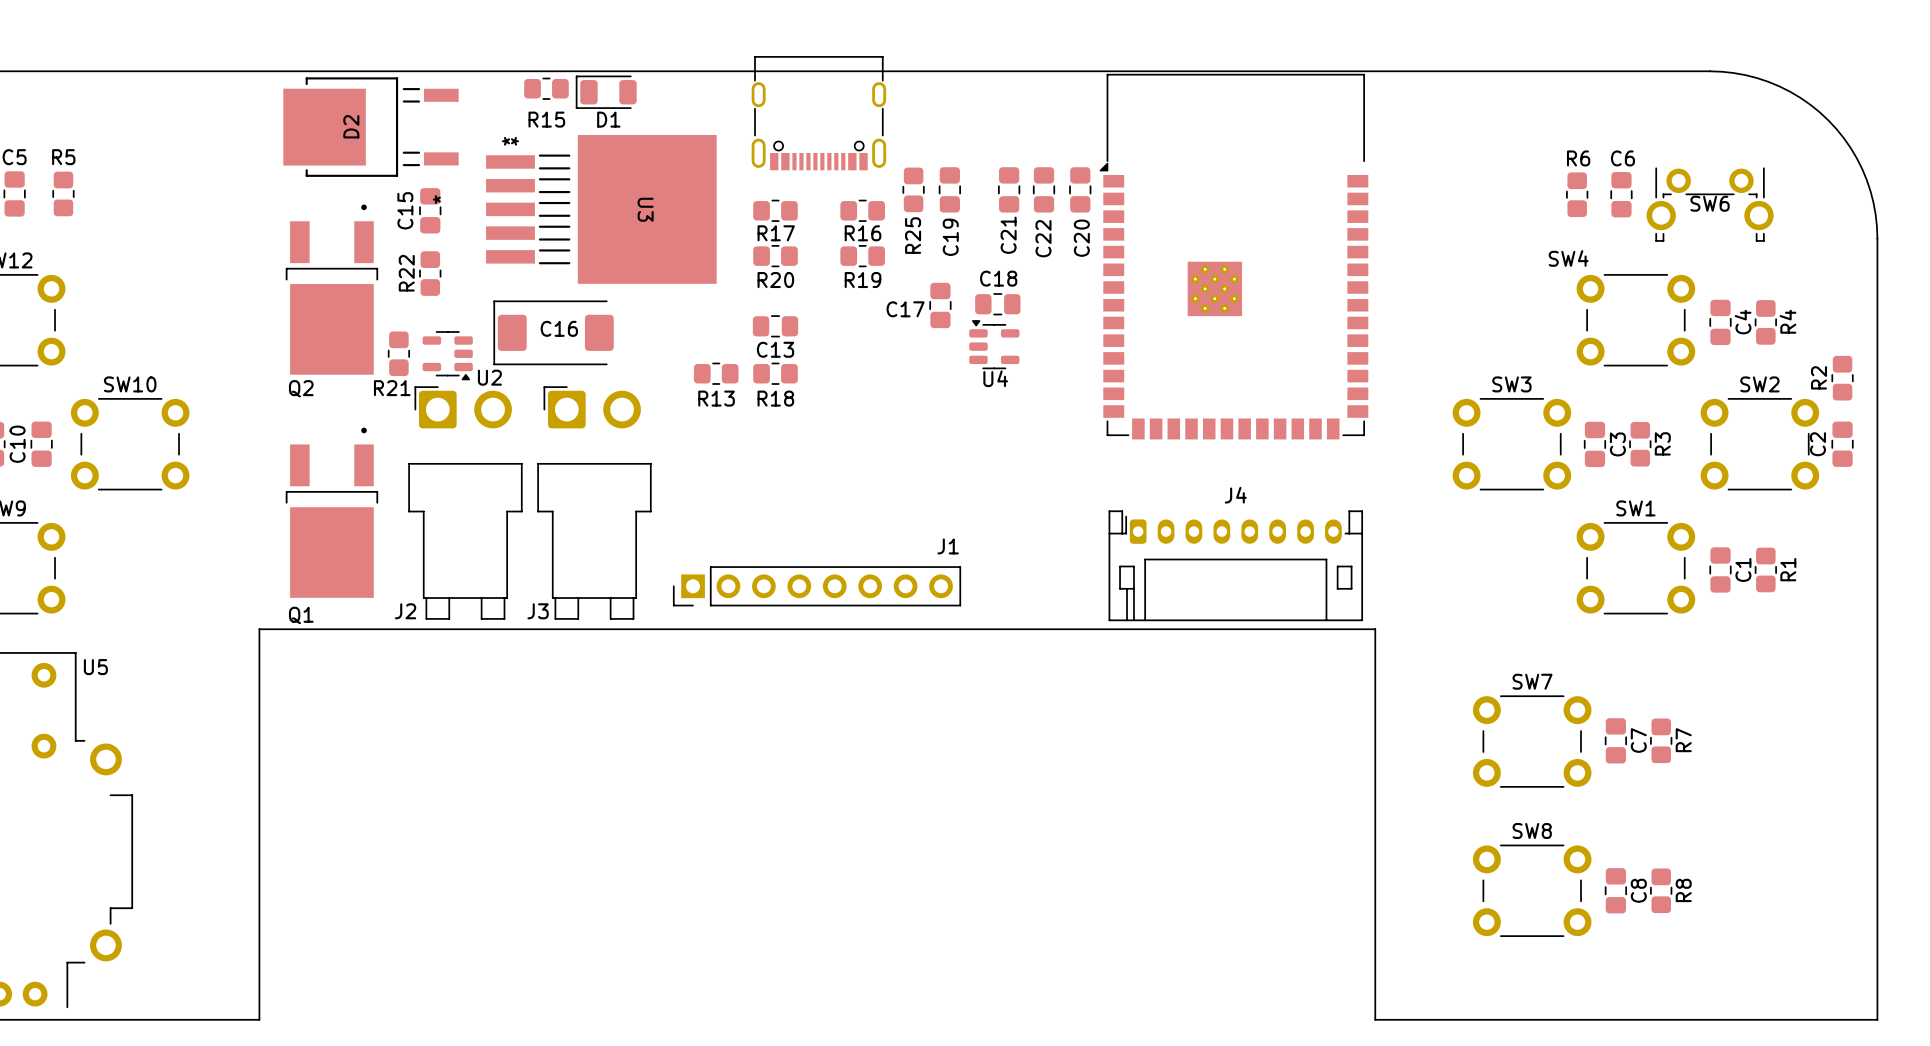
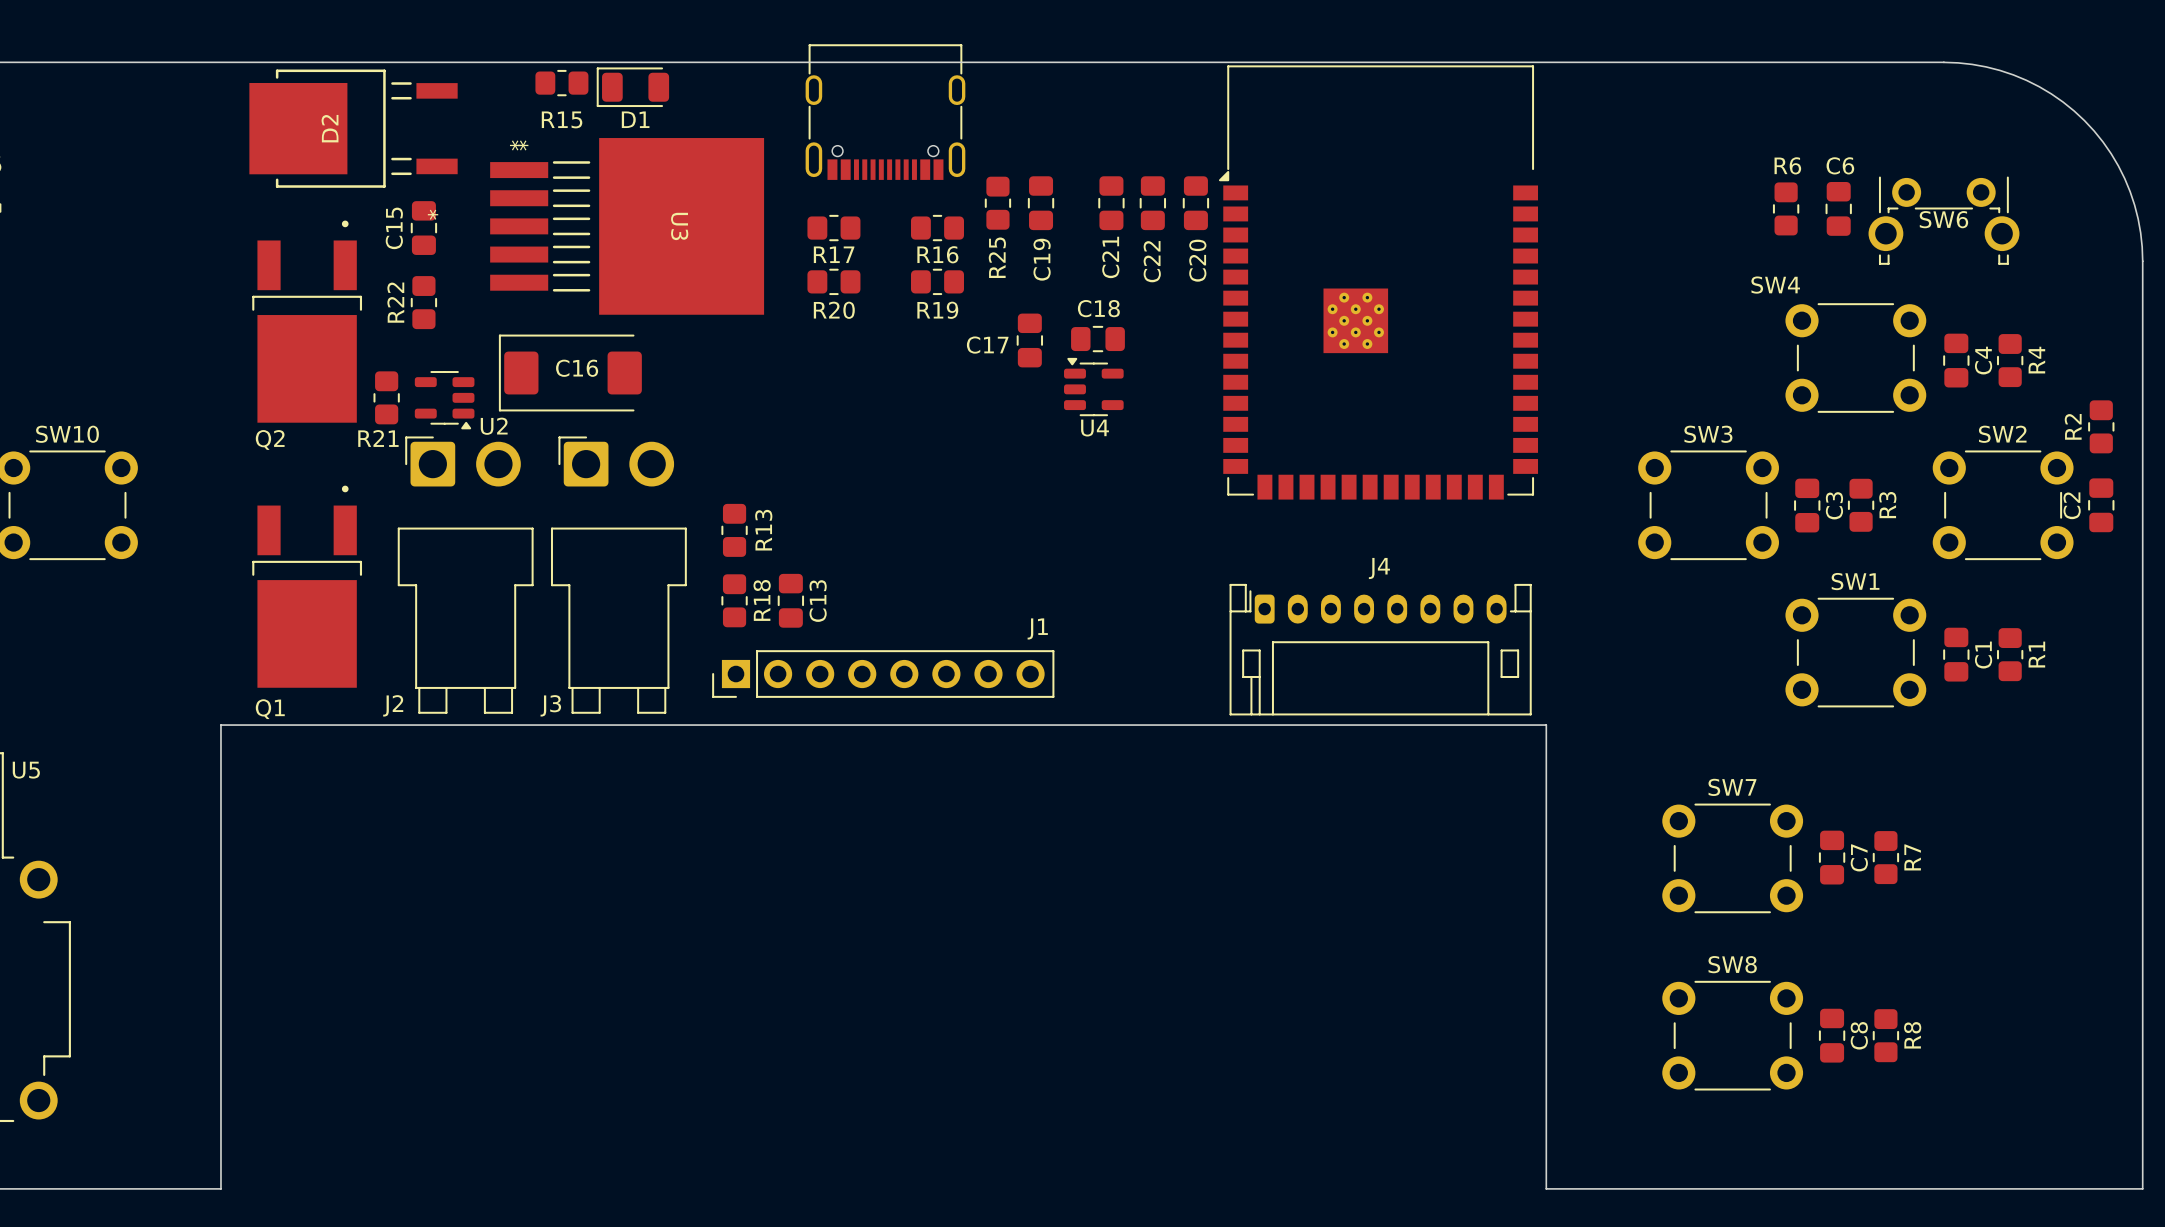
C13 rotation: 0° (775, 326) -> 90° clockwise (790, 600)
C13 position: (775, 326) -> (790, 600)
C13 name position: C13 (775, 349) -> C13 (818, 601)
R13 rotation: 0° (716, 373) -> 90° clockwise (734, 530)
R13 position: (716, 373) -> (734, 530)
R18 rotation: 0° (775, 373) -> 90° clockwise (734, 600)
R18 position: (775, 373) -> (734, 600)
R13 name position: R13 (716, 398) -> R13 (763, 530)
R18 name position: R18 (775, 398) -> R18 (762, 600)

